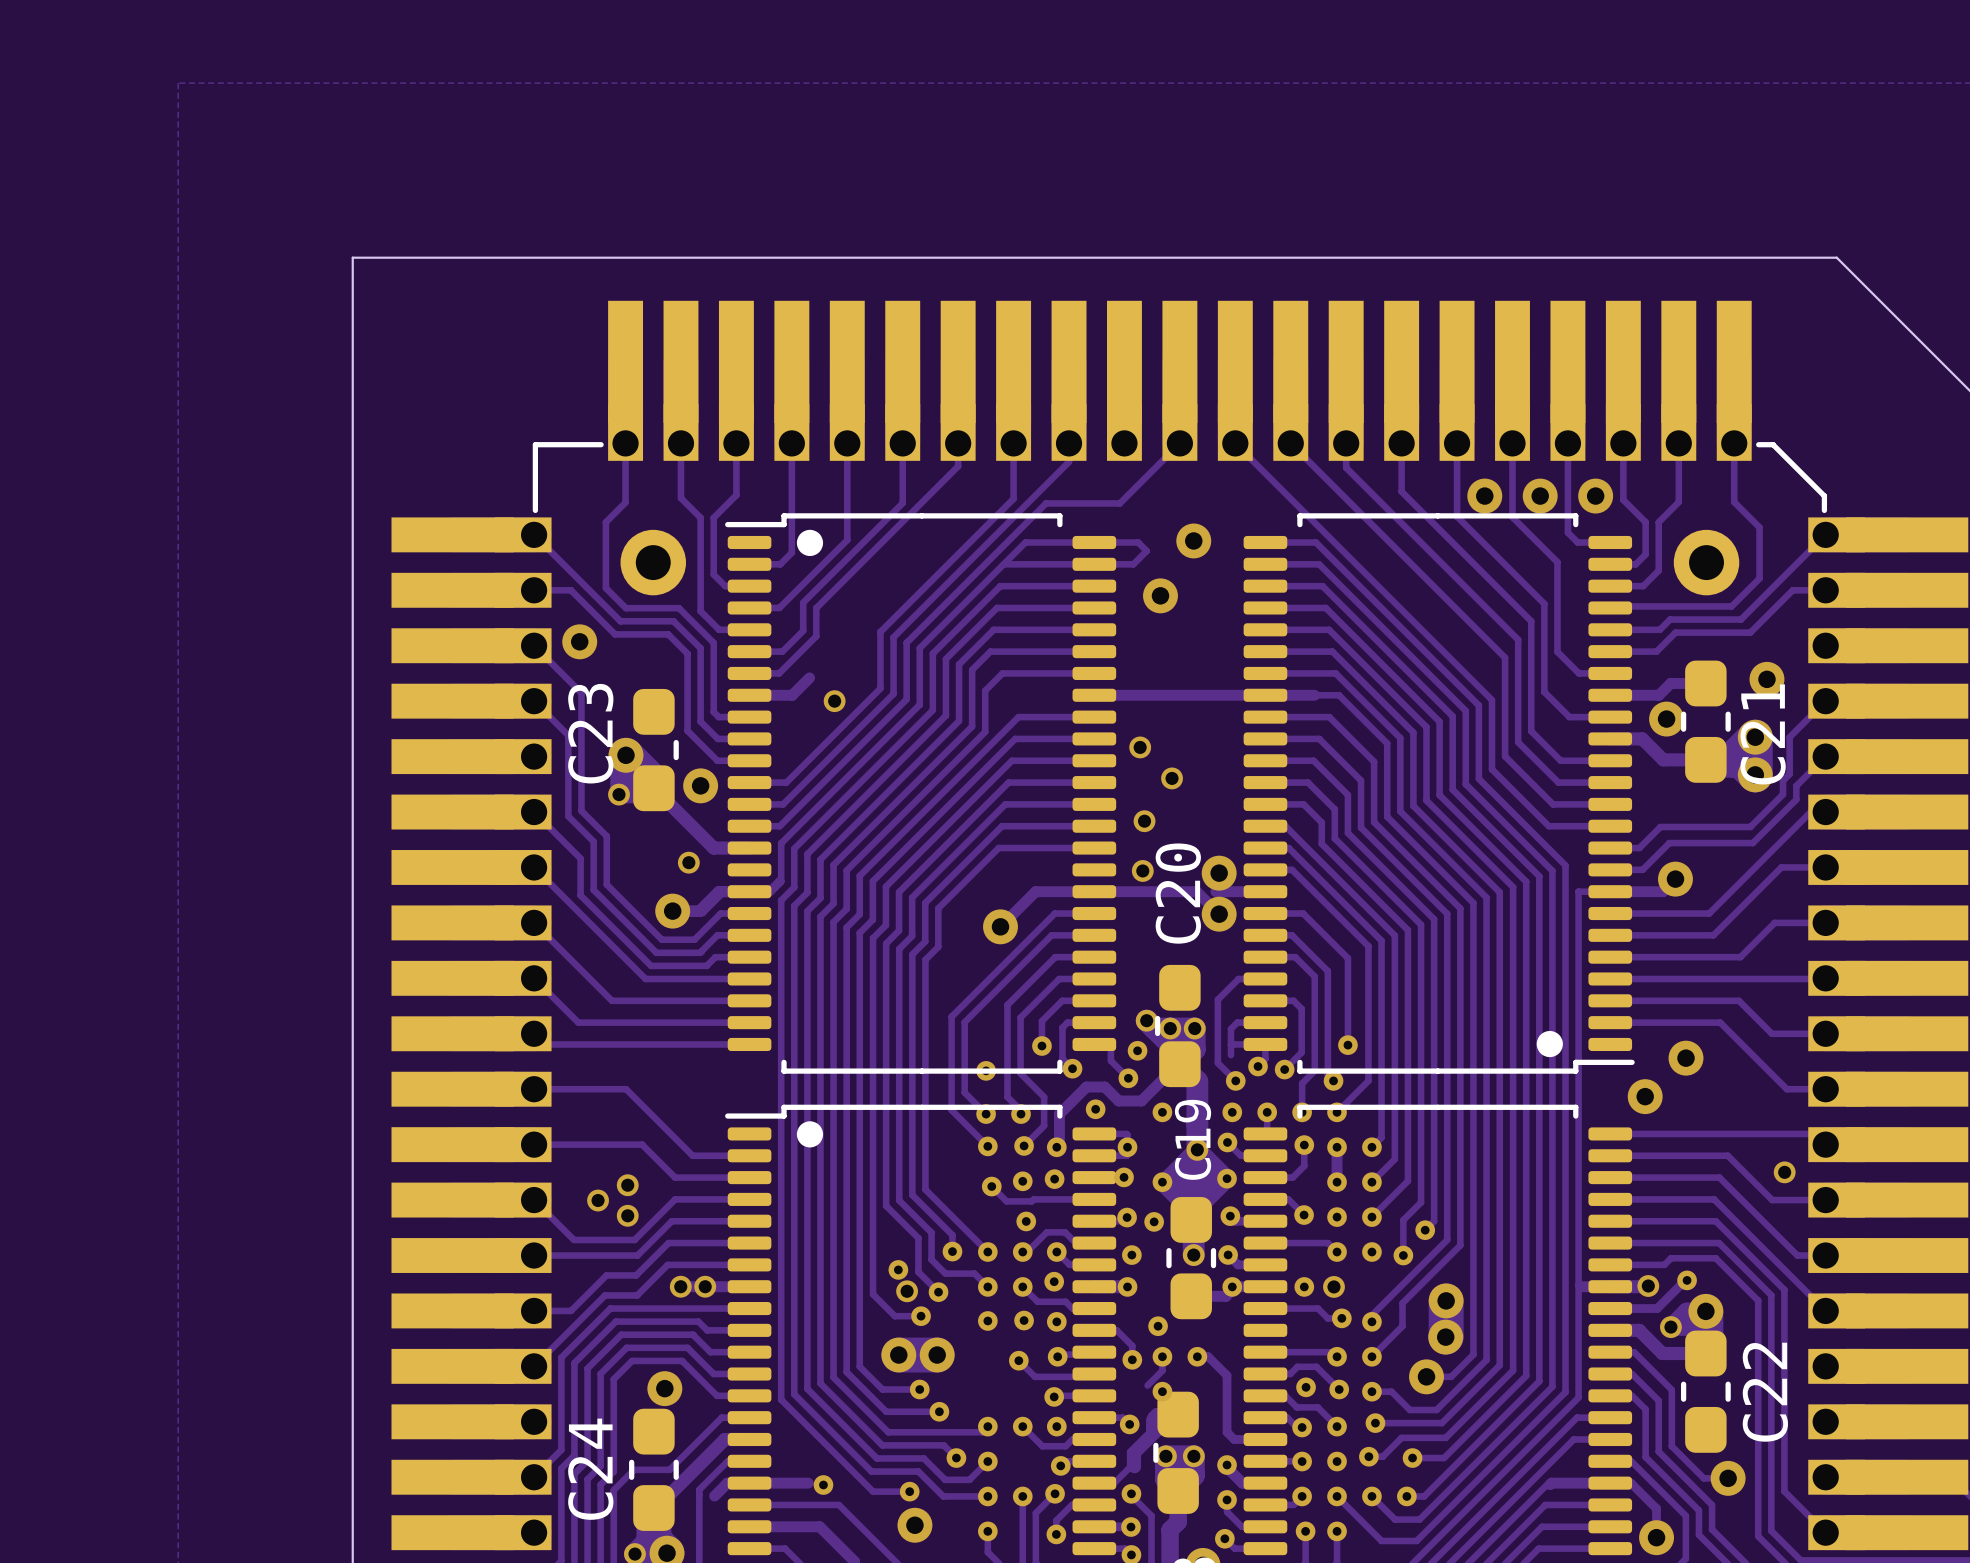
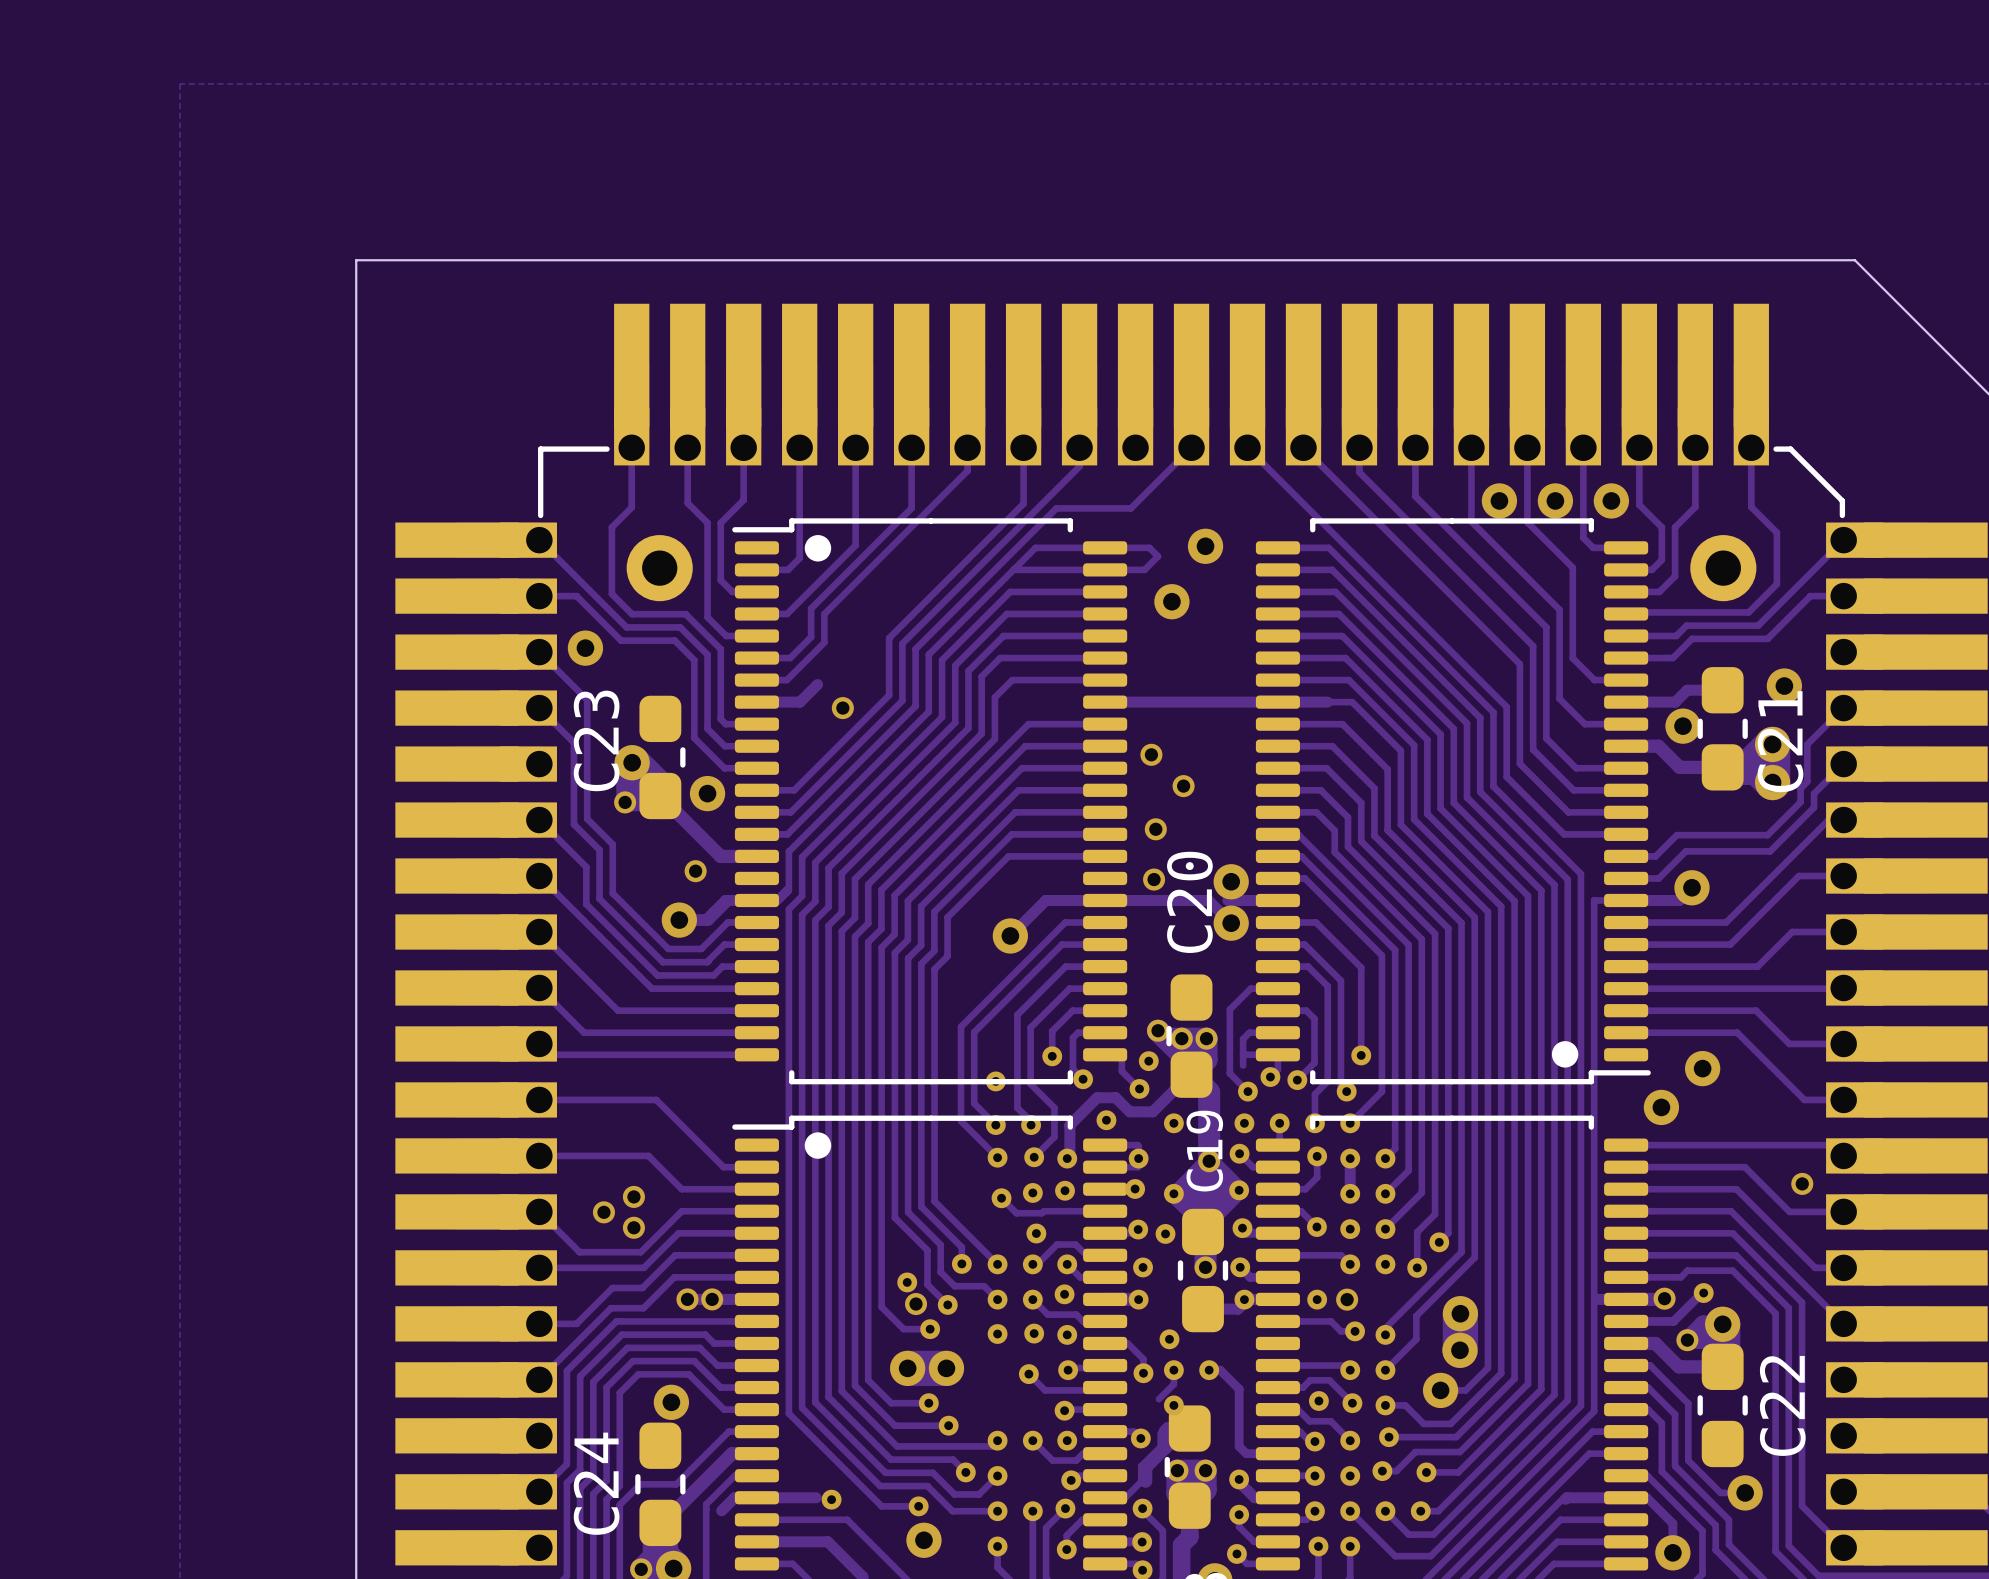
track: (626, 1089) (692, 1155) (716, 1155) -> (632, 1099) (656, 1099) (723, 1167)

